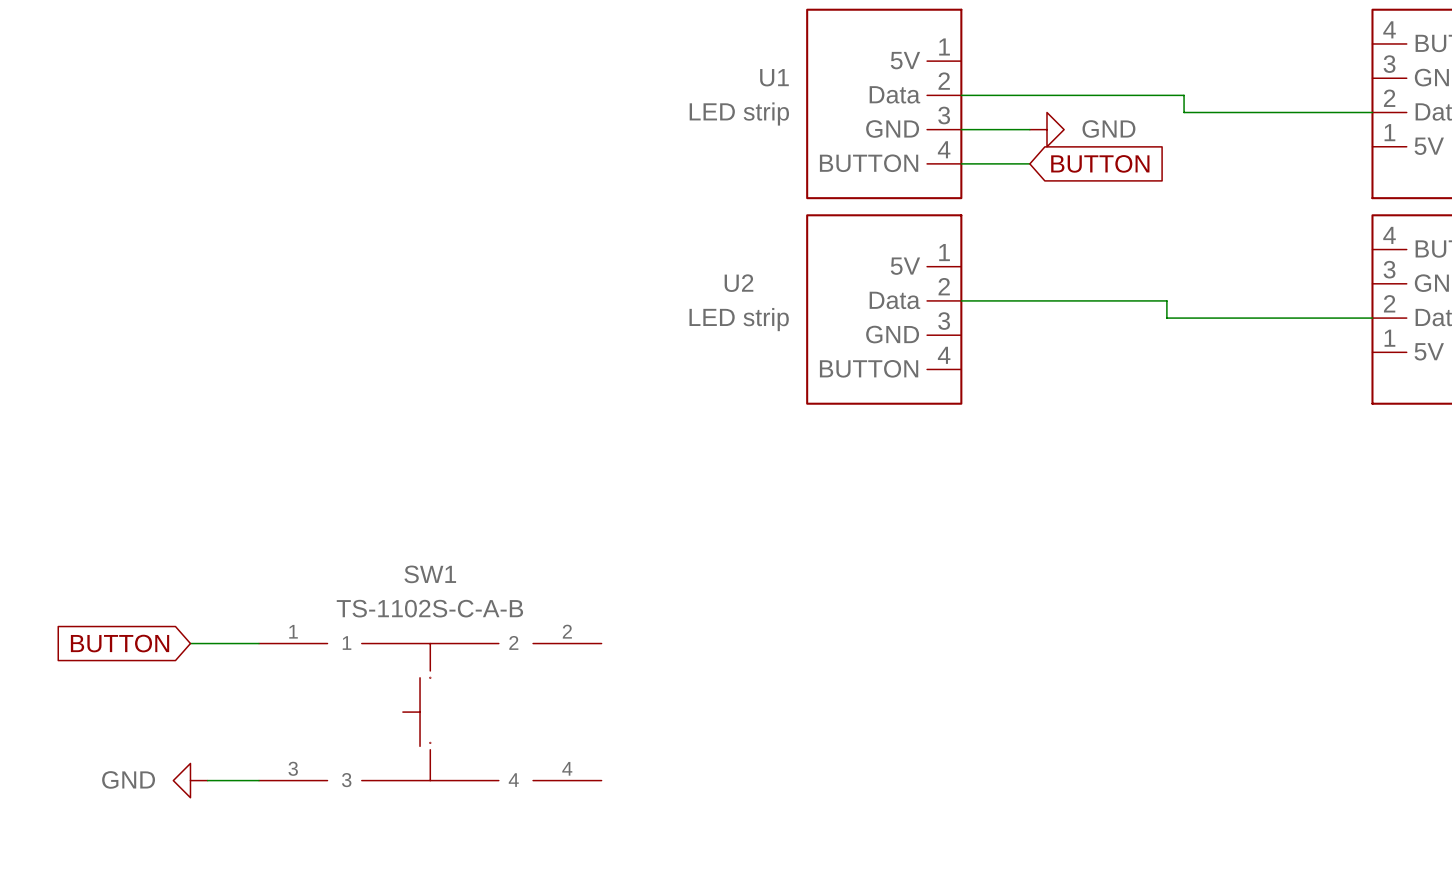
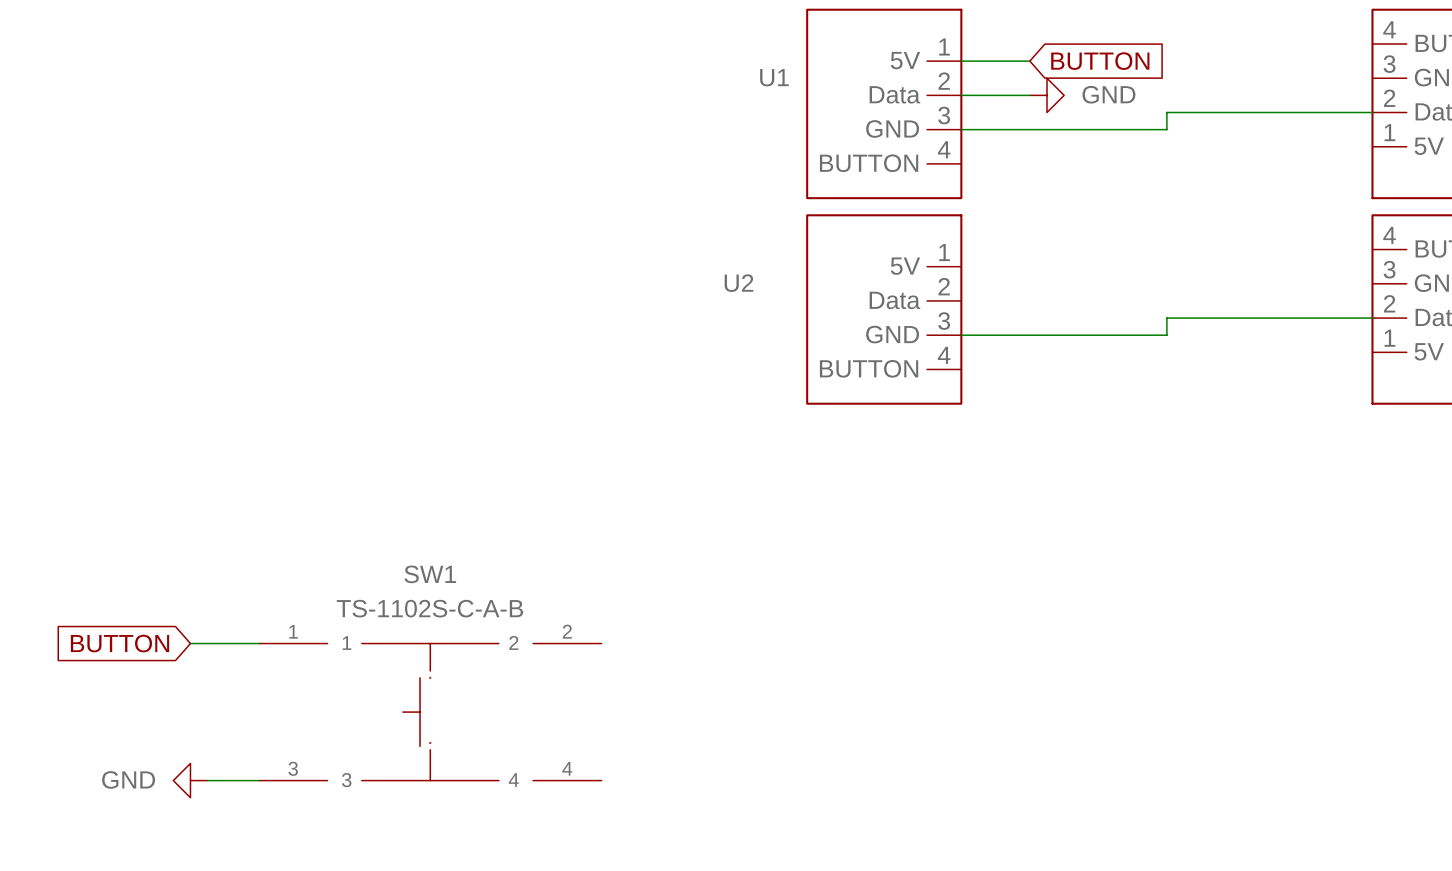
wire: (1029, 95) (1184, 95) (1184, 112) -> (1029, 129) (1166, 129) (1166, 112) (1184, 112)
U1 value: LED strip (739, 113) -> none
power symbol position: GND (1046, 129) -> GND (1046, 95)
wire: (961, 163) (1029, 163) -> (961, 61) (1029, 61)
global label position: BUTTON (1100, 163) -> BUTTON (1100, 61)
wire: (961, 300) (1166, 300) (1166, 318) -> (961, 335) (1166, 335) (1166, 318)
U2 value: LED strip (739, 319) -> none

